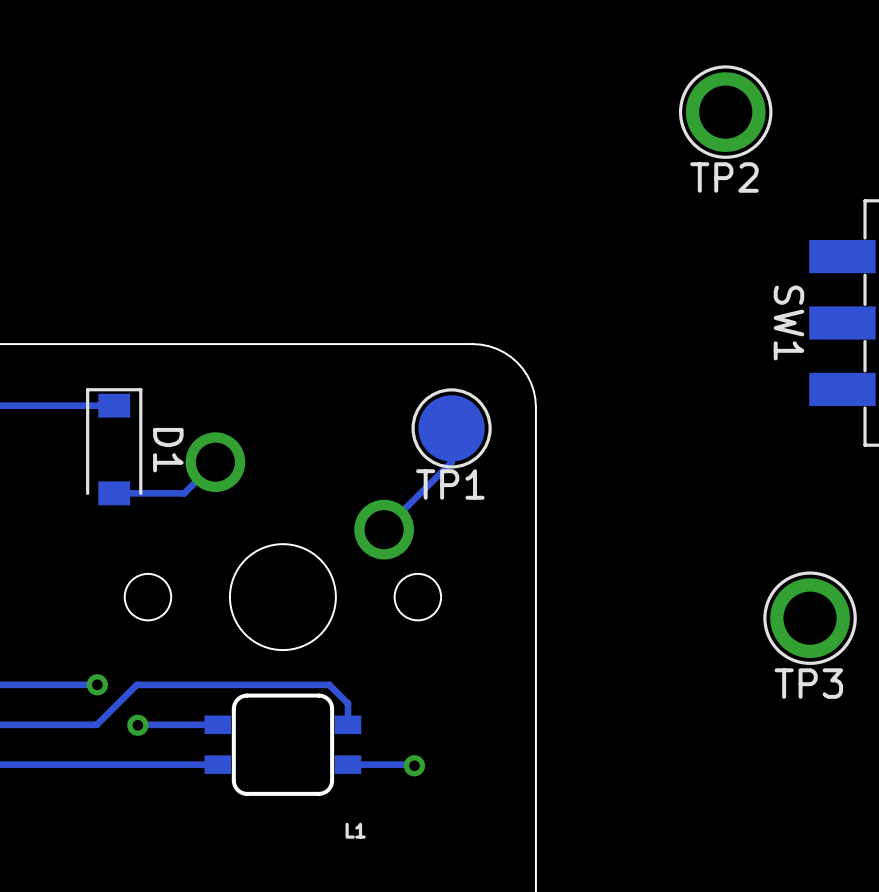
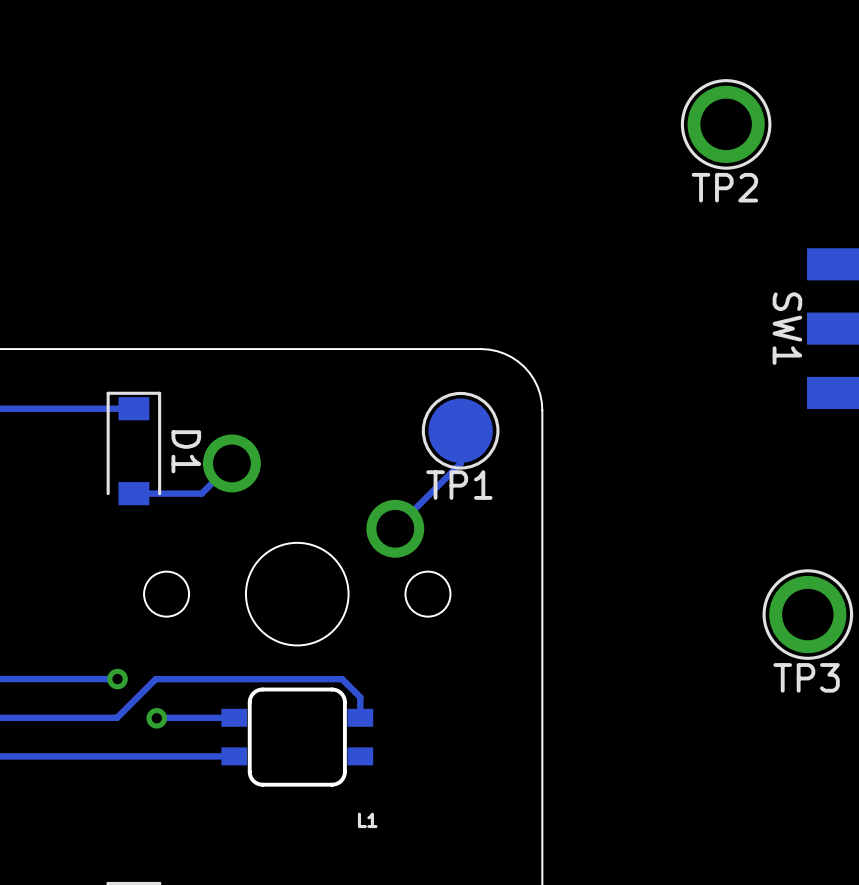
track: (347, 764) (414, 765) -> none
via: (414, 765) -> none

